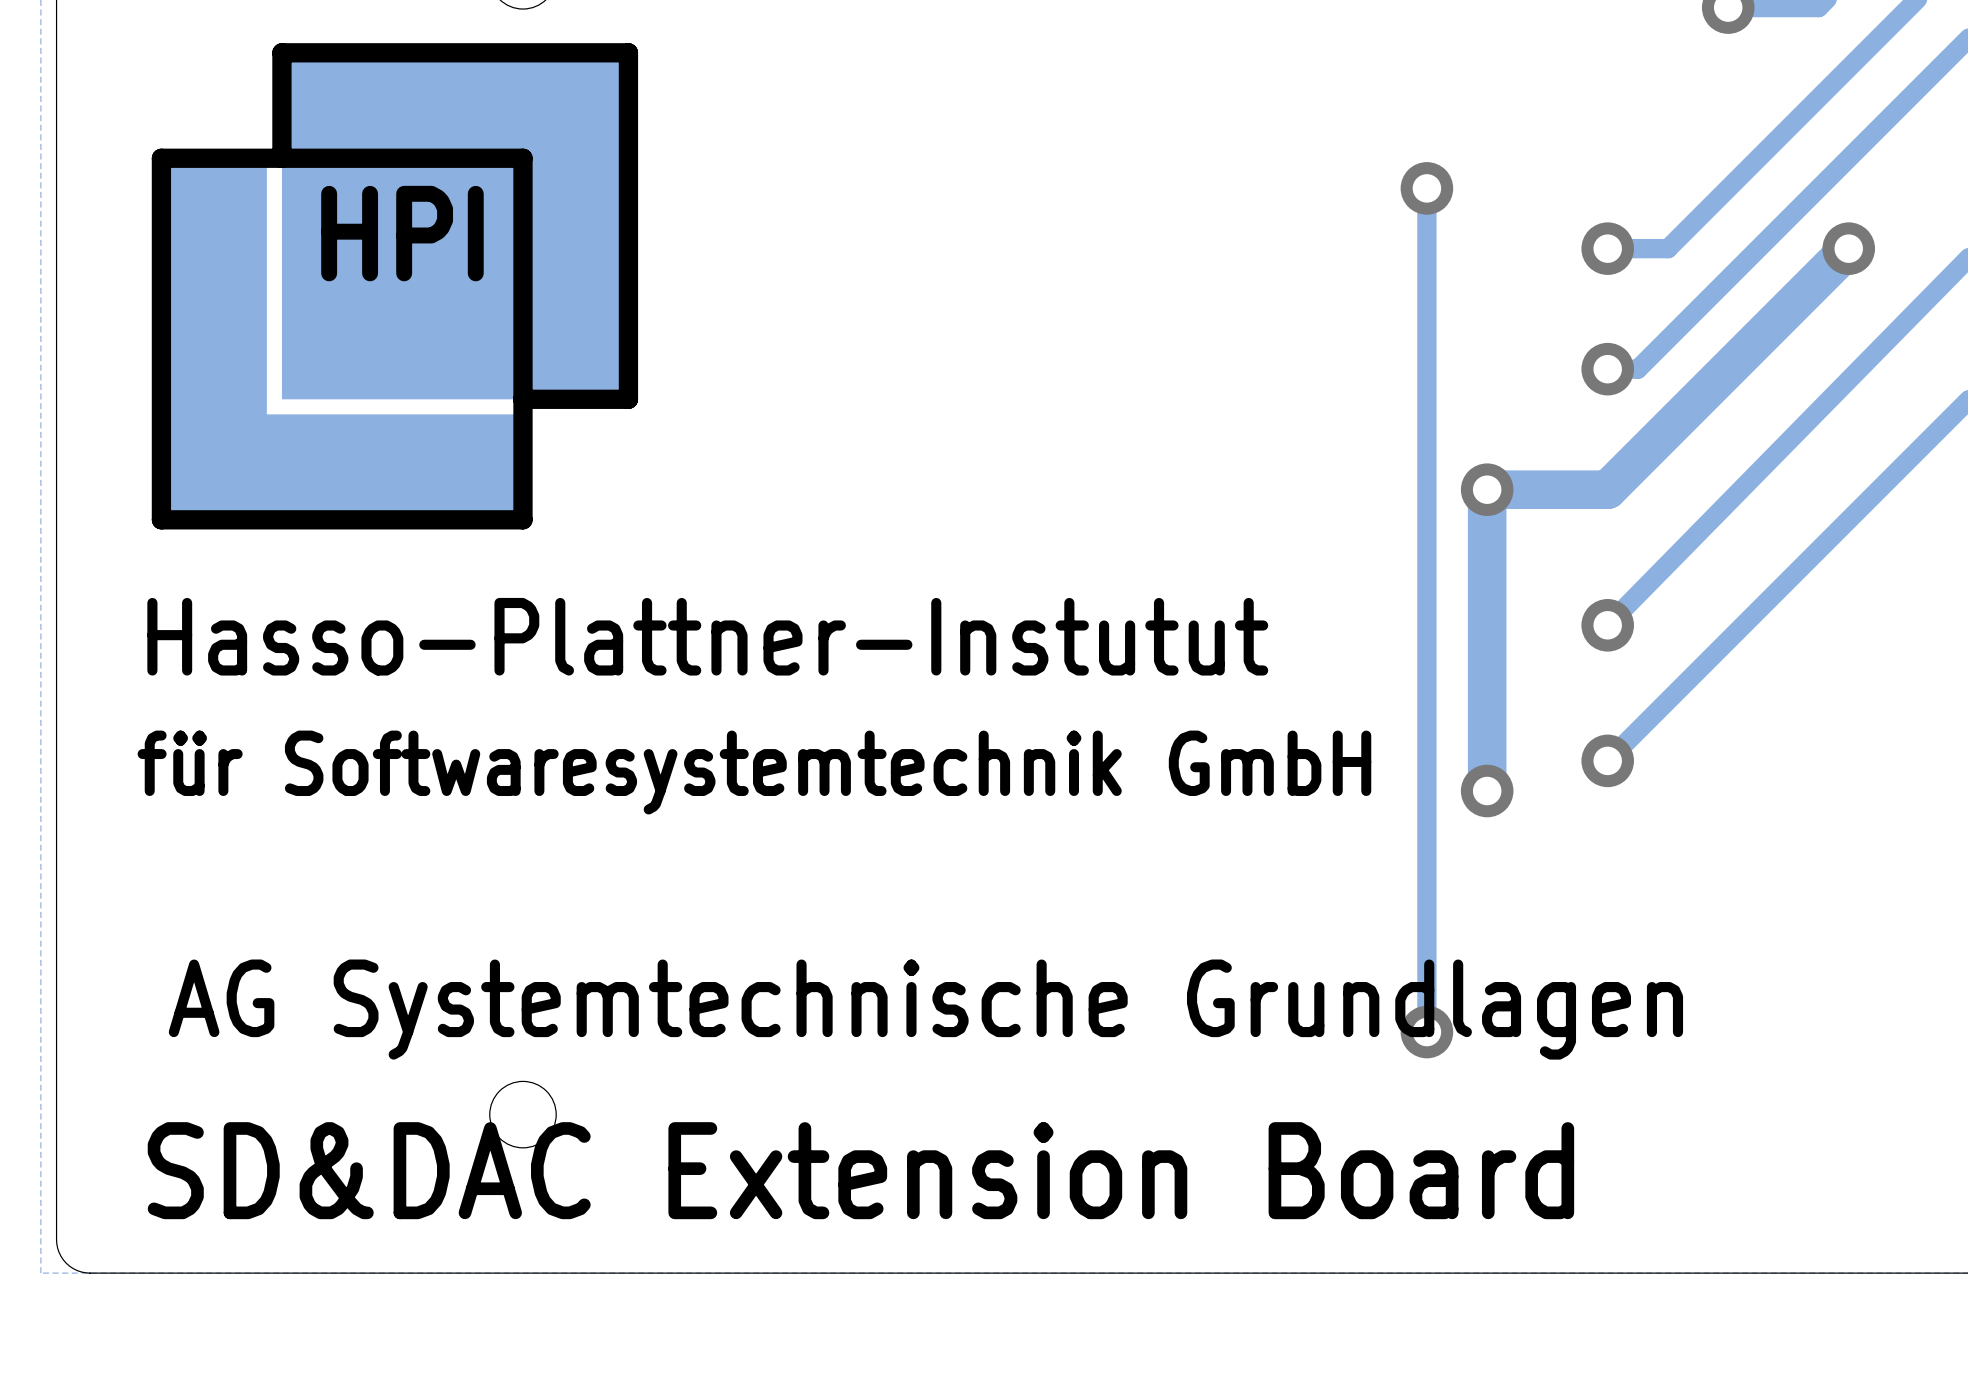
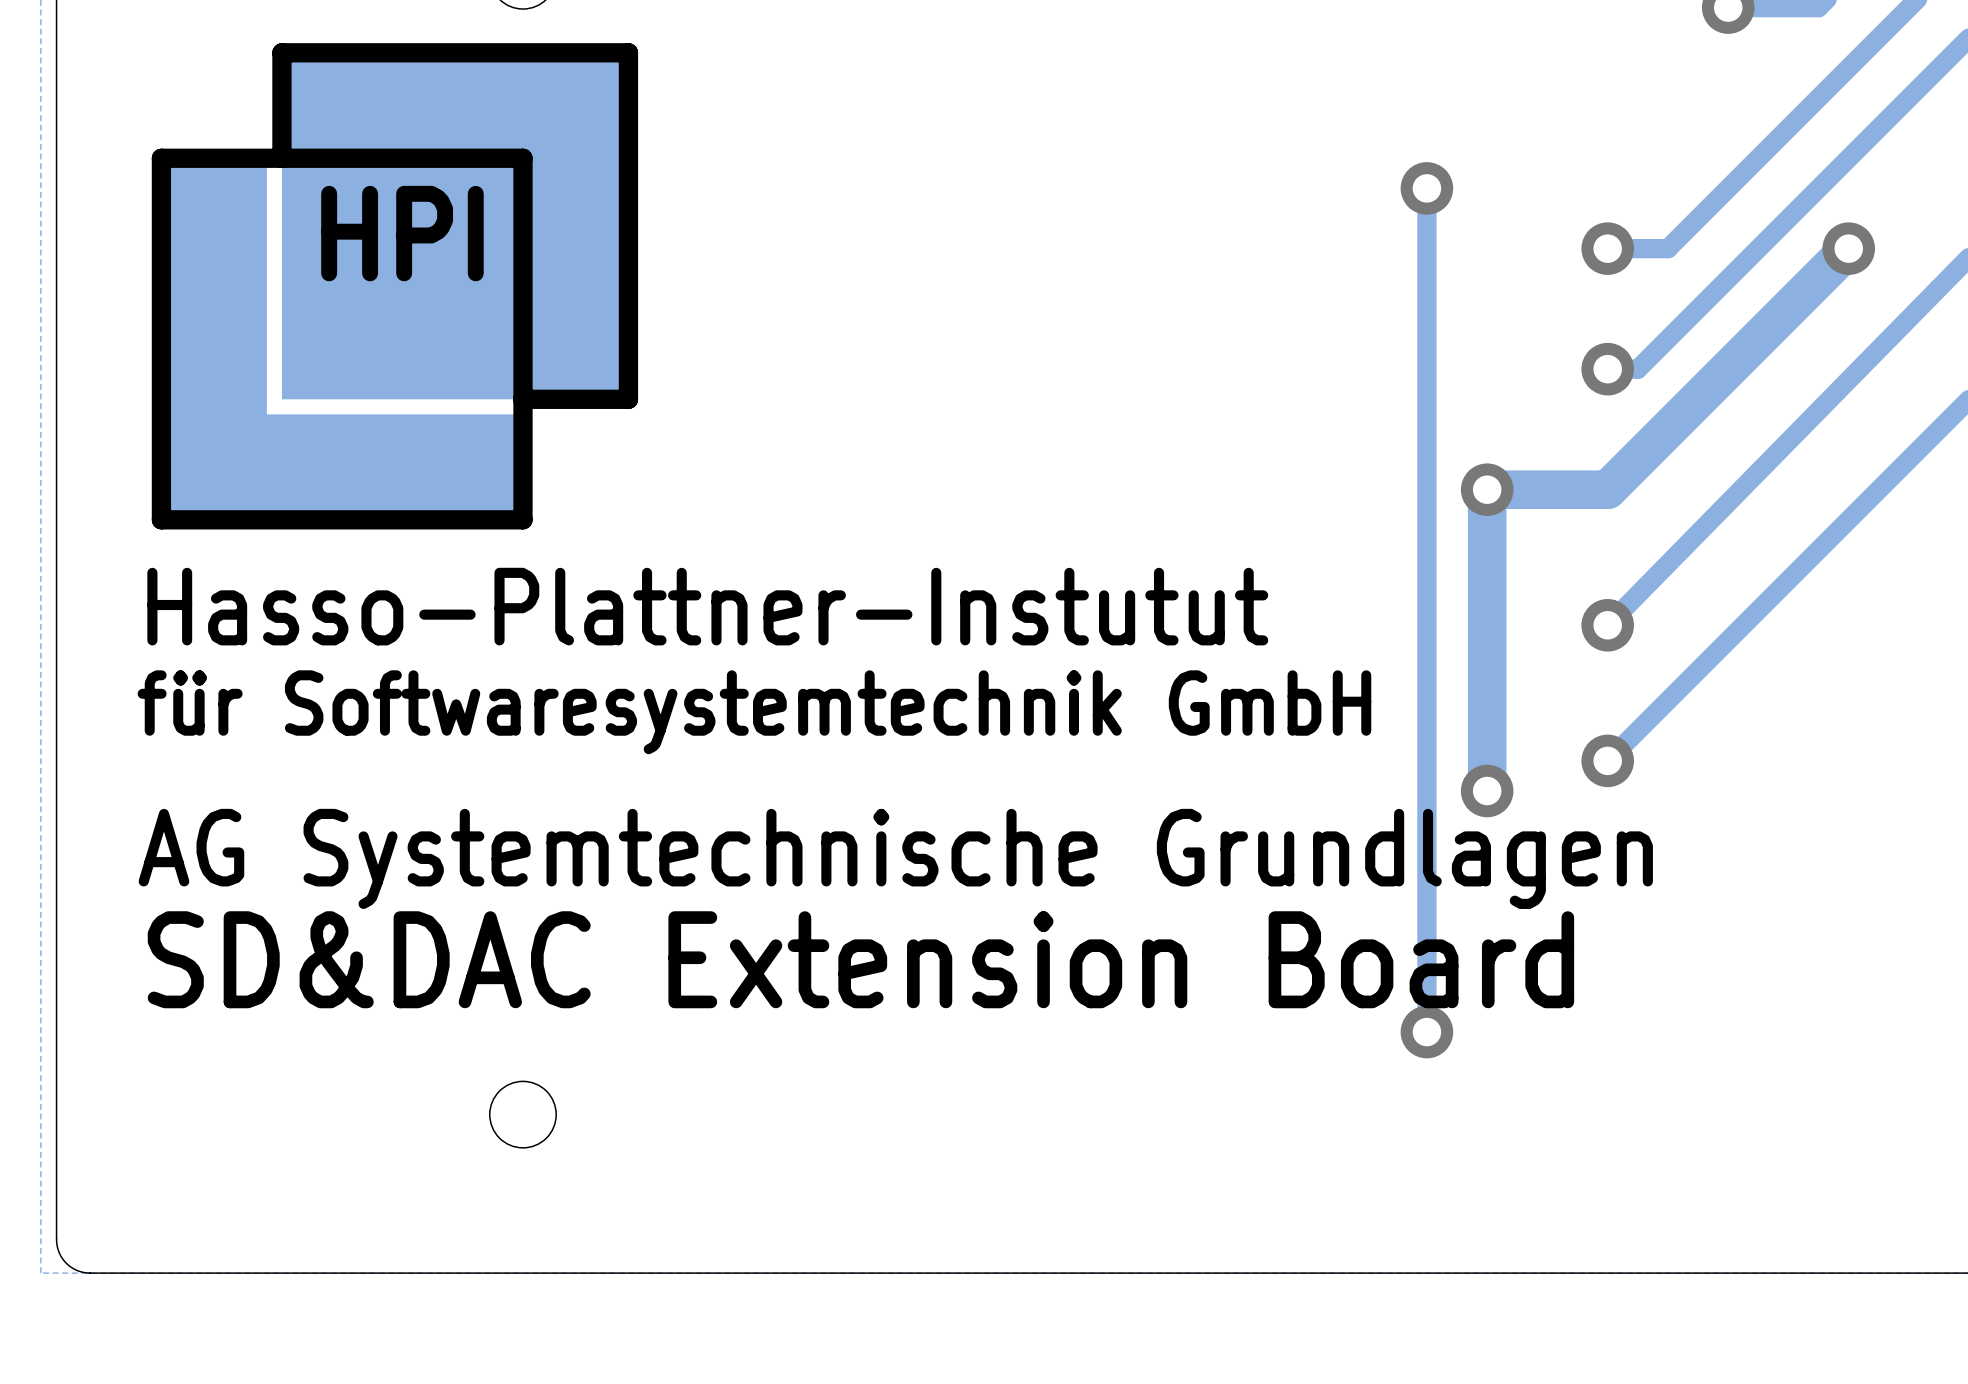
text position: Hasso-Plattner-Instutut (707, 636) -> Hasso-Plattner-Instutut (707, 606)
text position: für Softwaresystemtechnik GmbH (754, 772) -> für Softwaresystemtechnik GmbH (754, 712)
text position: AG Systemtechnische Grundlagen (925, 1009) -> AG Systemtechnische Grundlagen (895, 858)
text position: SD&DAC Extension Board (860, 1170) -> SD&DAC Extension Board (860, 959)

